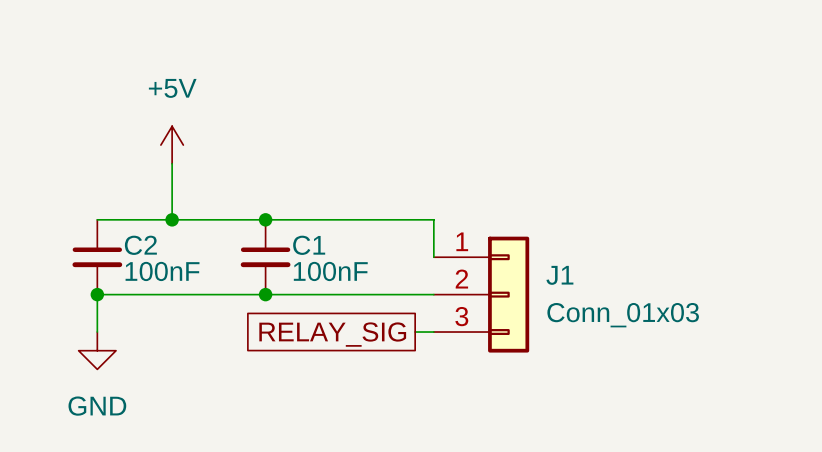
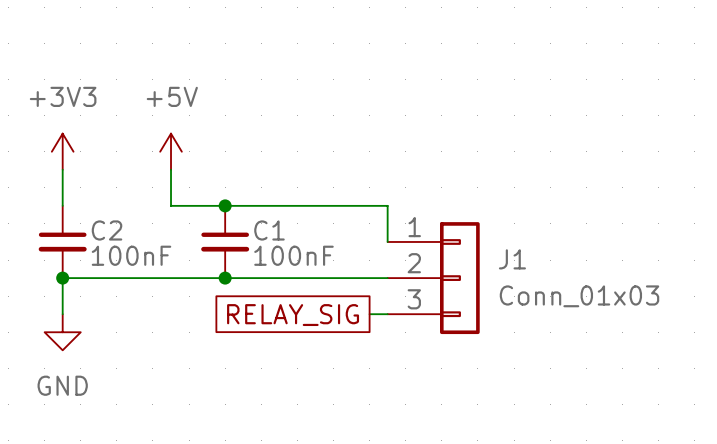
power symbol position: +5V (172, 145) -> +5V (171, 151)
power symbol: none -> +3V3 (62, 151)
wire: (172, 163) (172, 219) -> none
wire: none -> (171, 169) (171, 205)
wire: (97, 219) (209, 219) -> (62, 205) (62, 169)
junction: (172, 219) -> none

